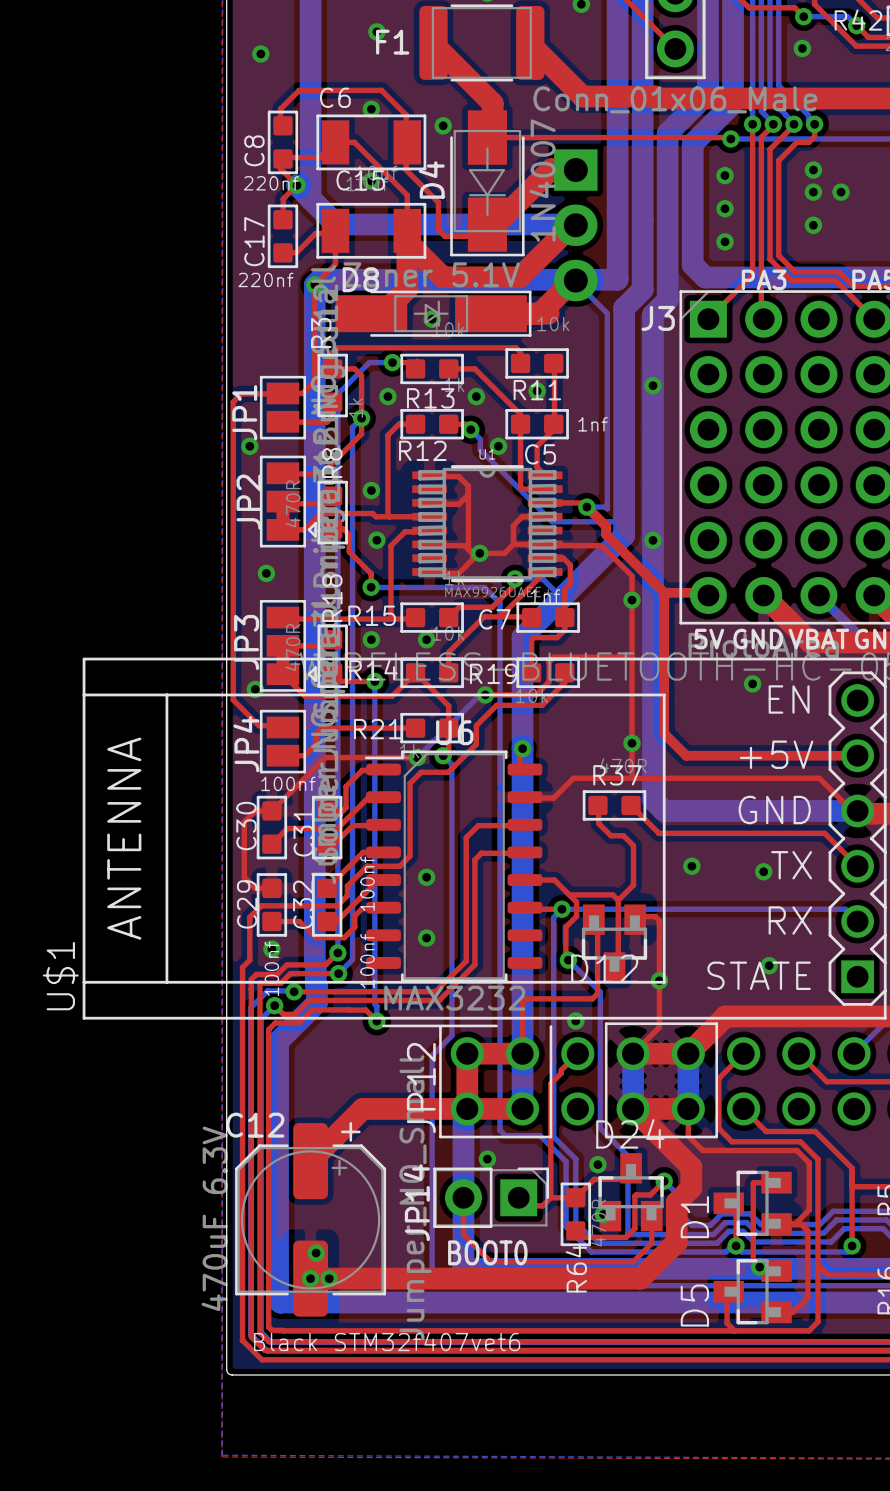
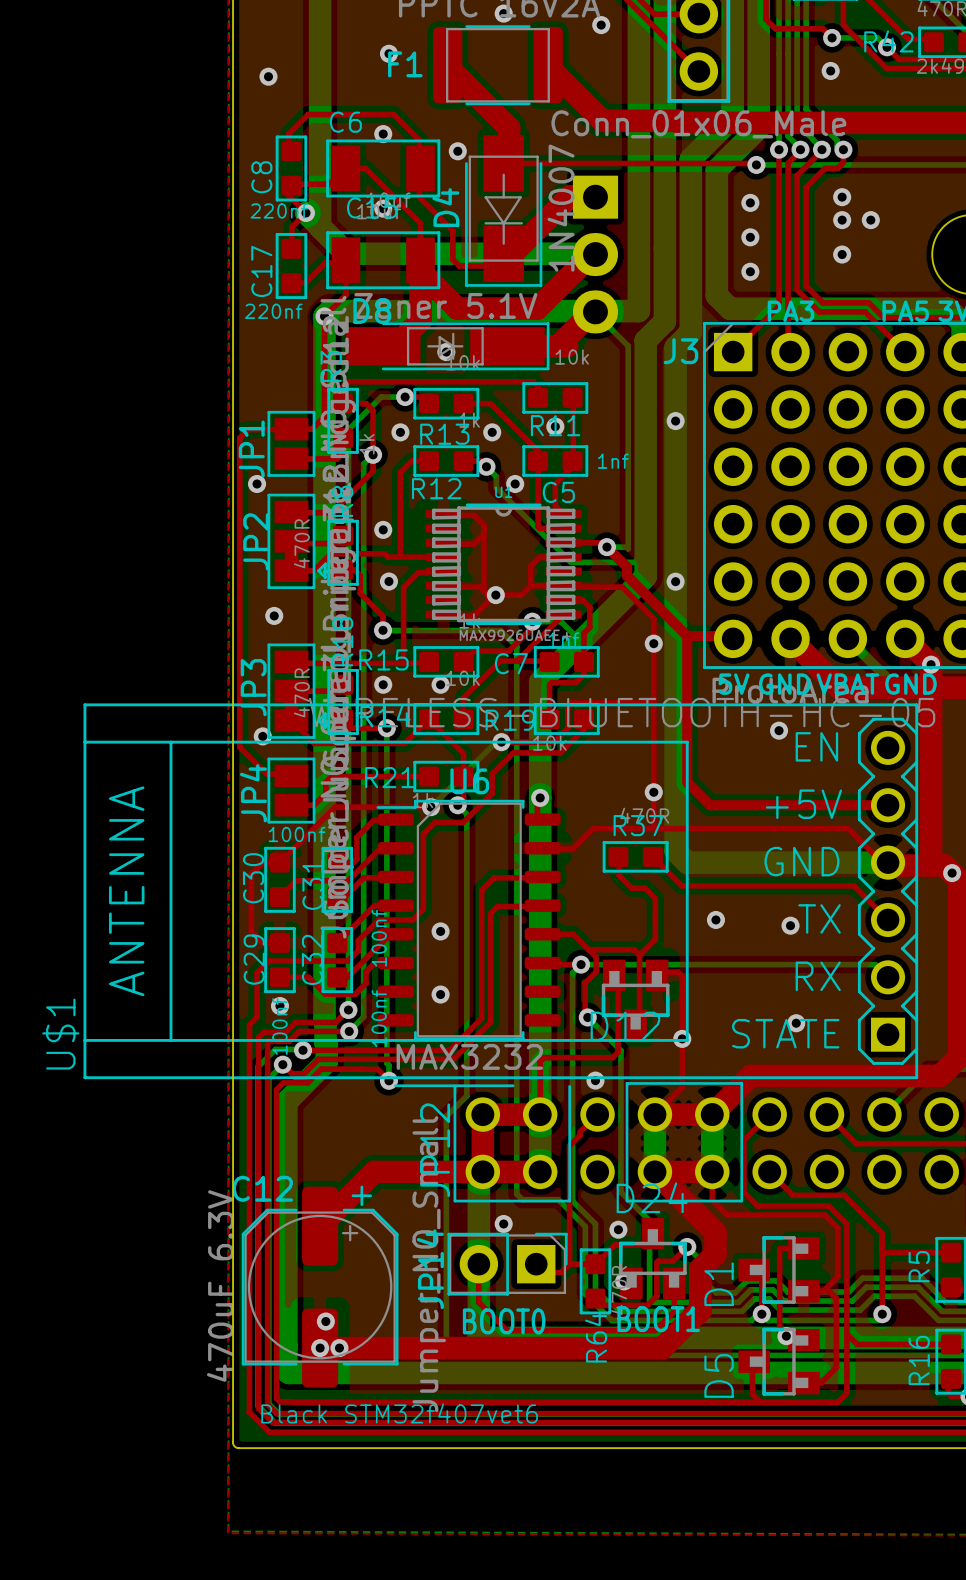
text: none -> BOOT1 (658, 1319)

